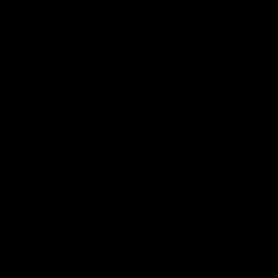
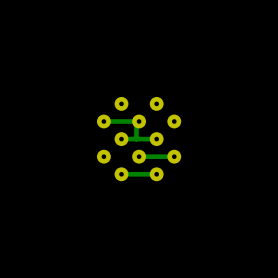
track: none -> (136, 121) (136, 139)
track: none -> (139, 121) (103, 121)
part: none -> (139, 139)
track: none -> (156, 139) (121, 139)
track: none -> (174, 156) (139, 156)
track: none -> (156, 174) (121, 174)

